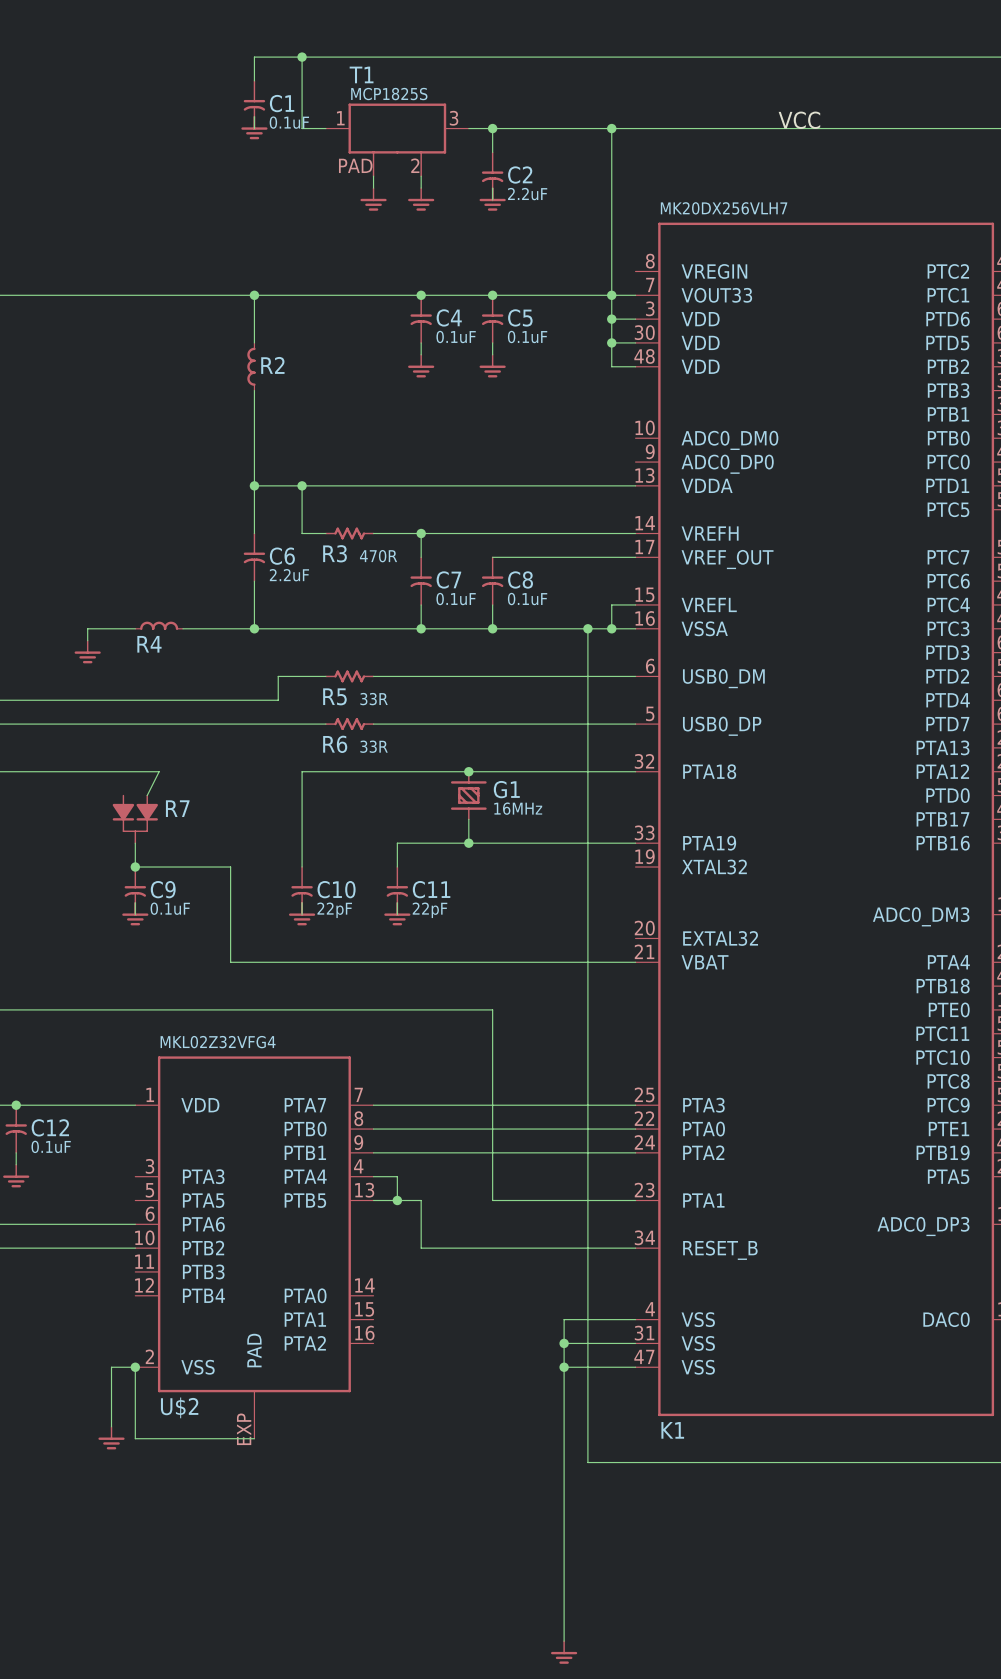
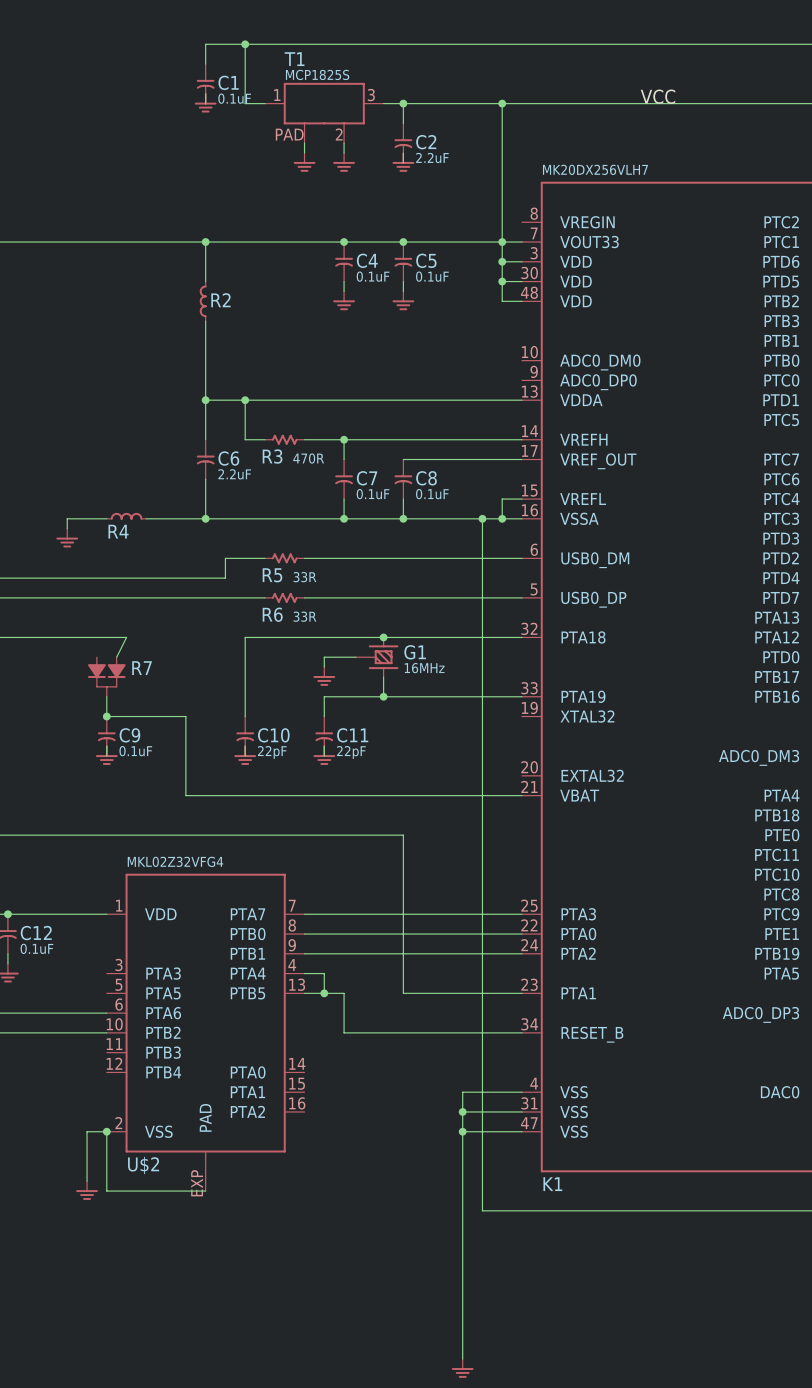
G1 symbol: [450, 771, 487, 821] -> [355, 636, 399, 678]
wire: none -> (355, 657) (324, 657) (324, 667)
power symbol: none -> (324, 676)

